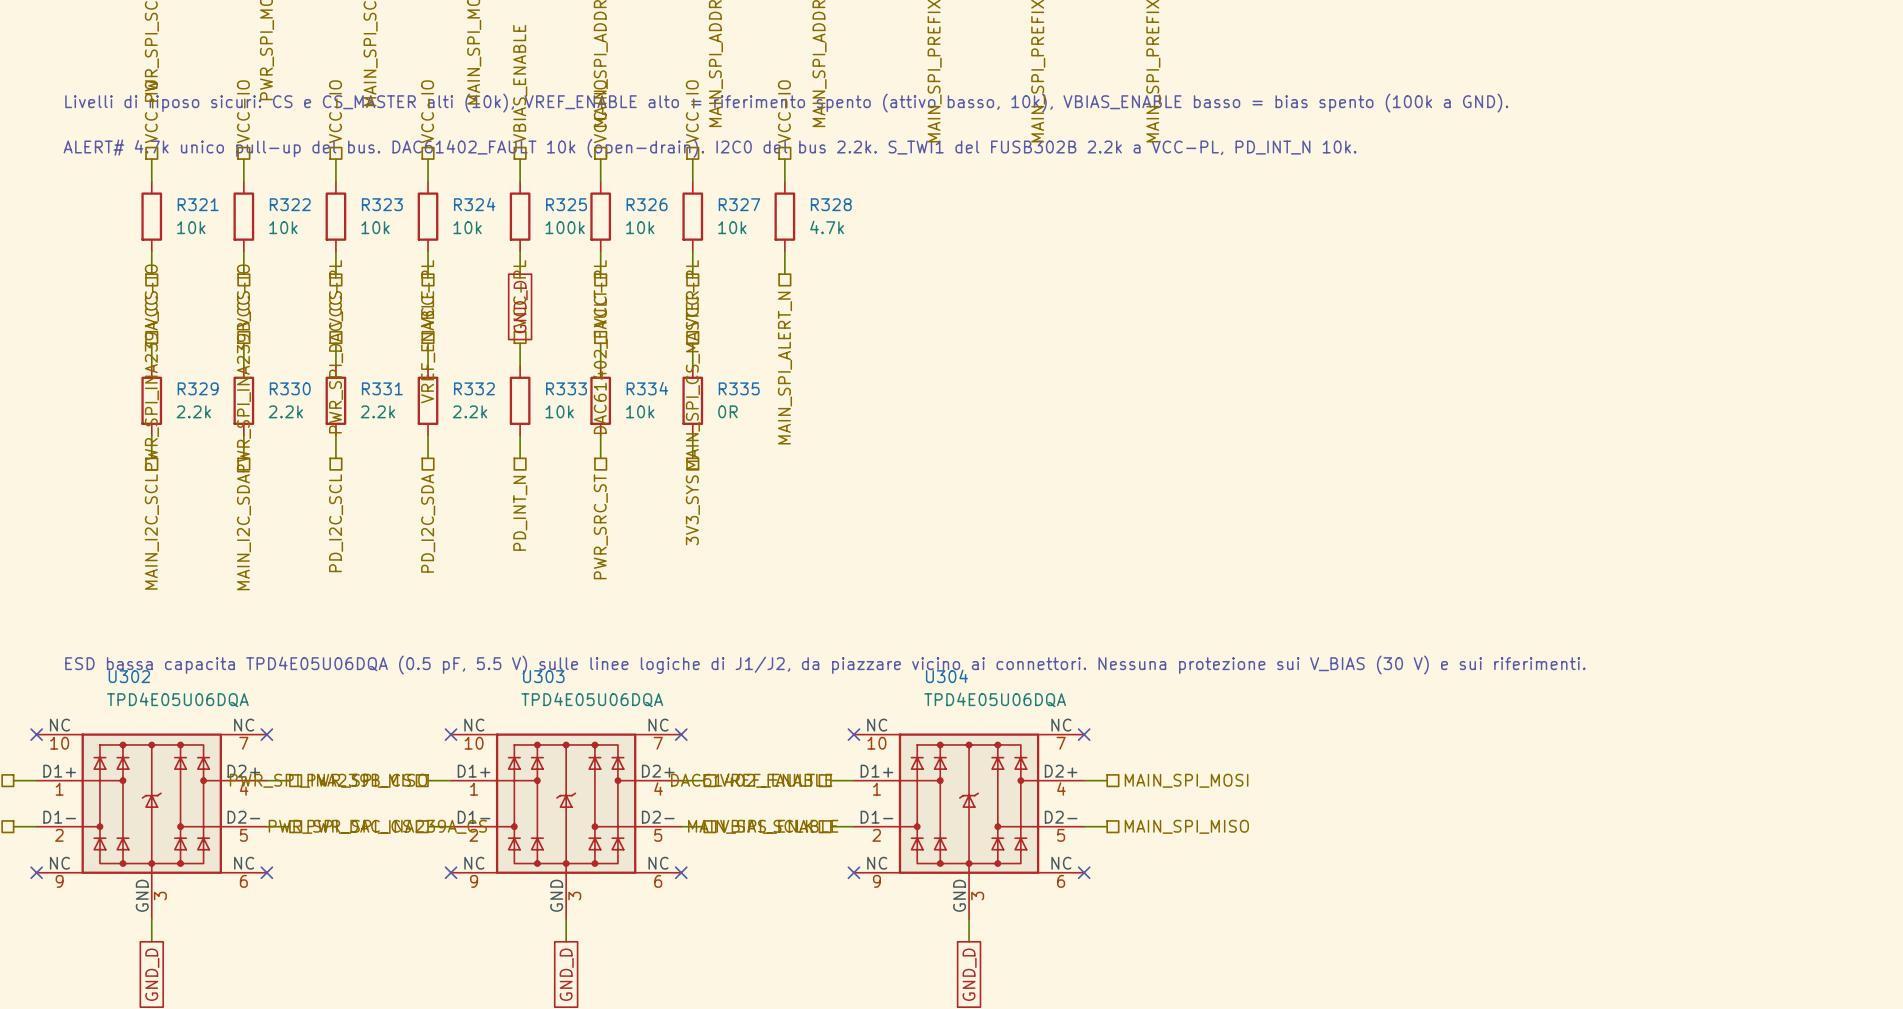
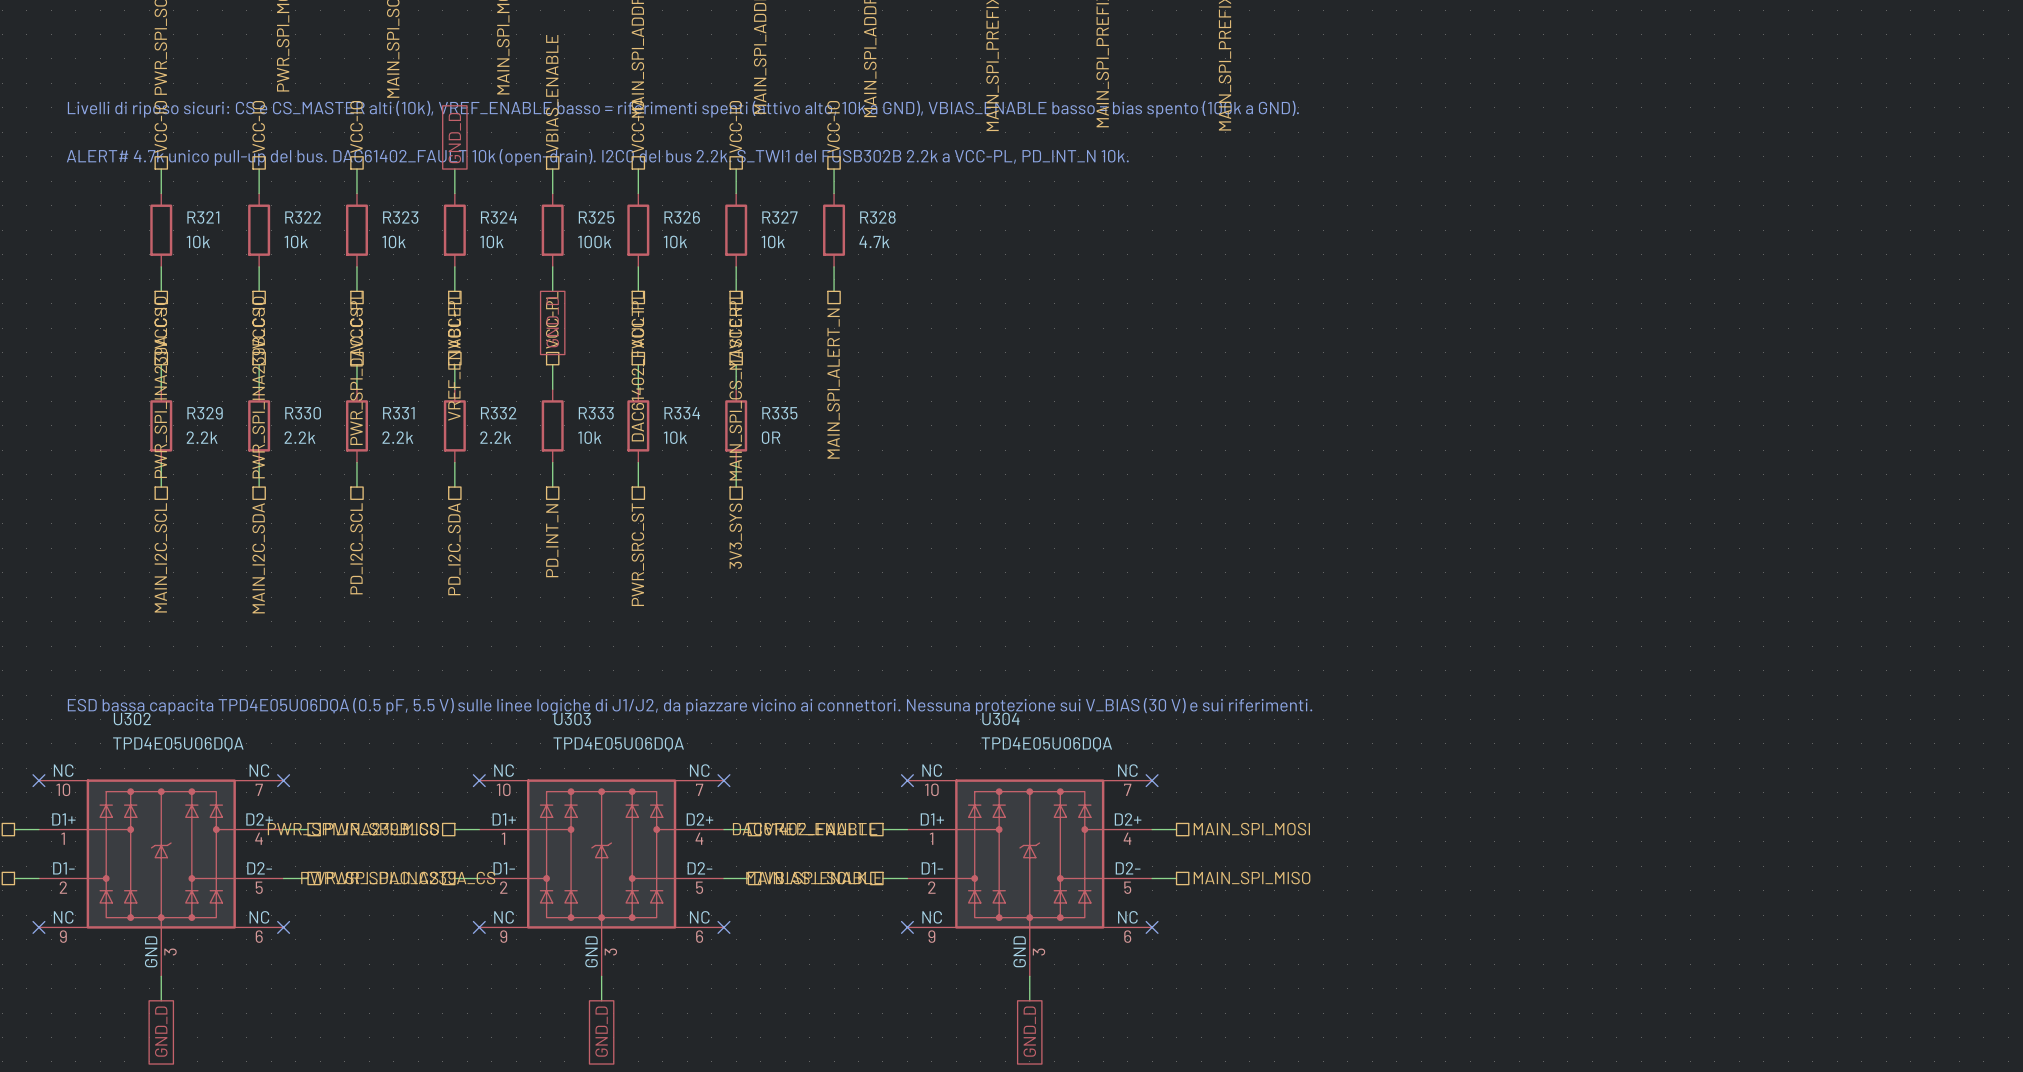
text: Livelli di riposo sicuri: CS e CS_MASTER alti (10k), VREF_ENABLE alto = riferimento spento (attivo basso, 10k), VBIAS_ENABLE basso = bias spento (100k a GND). (786, 103) -> Livelli di riposo sicuri: CS e CS_MASTER alti (10k), VREF_ENABLE basso = riferimenti spenti (attivo alto, 10k a GND), VBIAS_ENABLE basso = bias spento (100k a GND). (683, 109)
hierarchical label: VCC-IO (427, 111) -> none
global label: none -> GND_D (454, 138)

